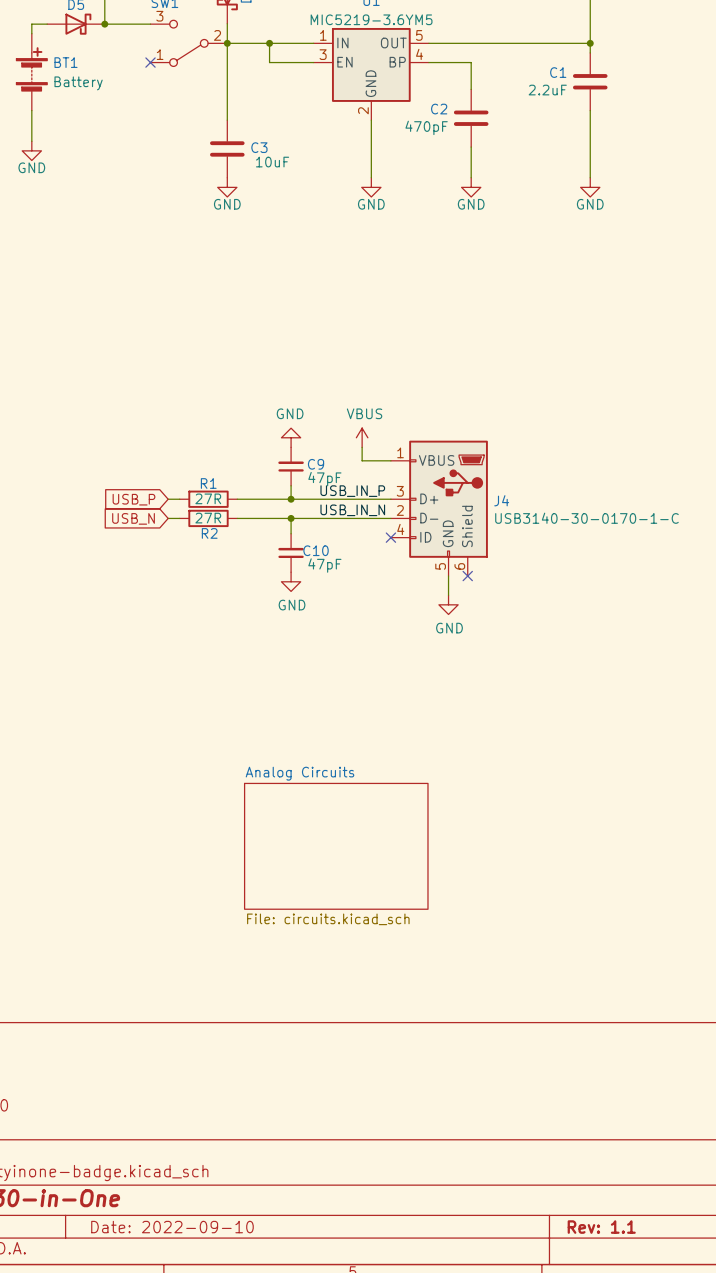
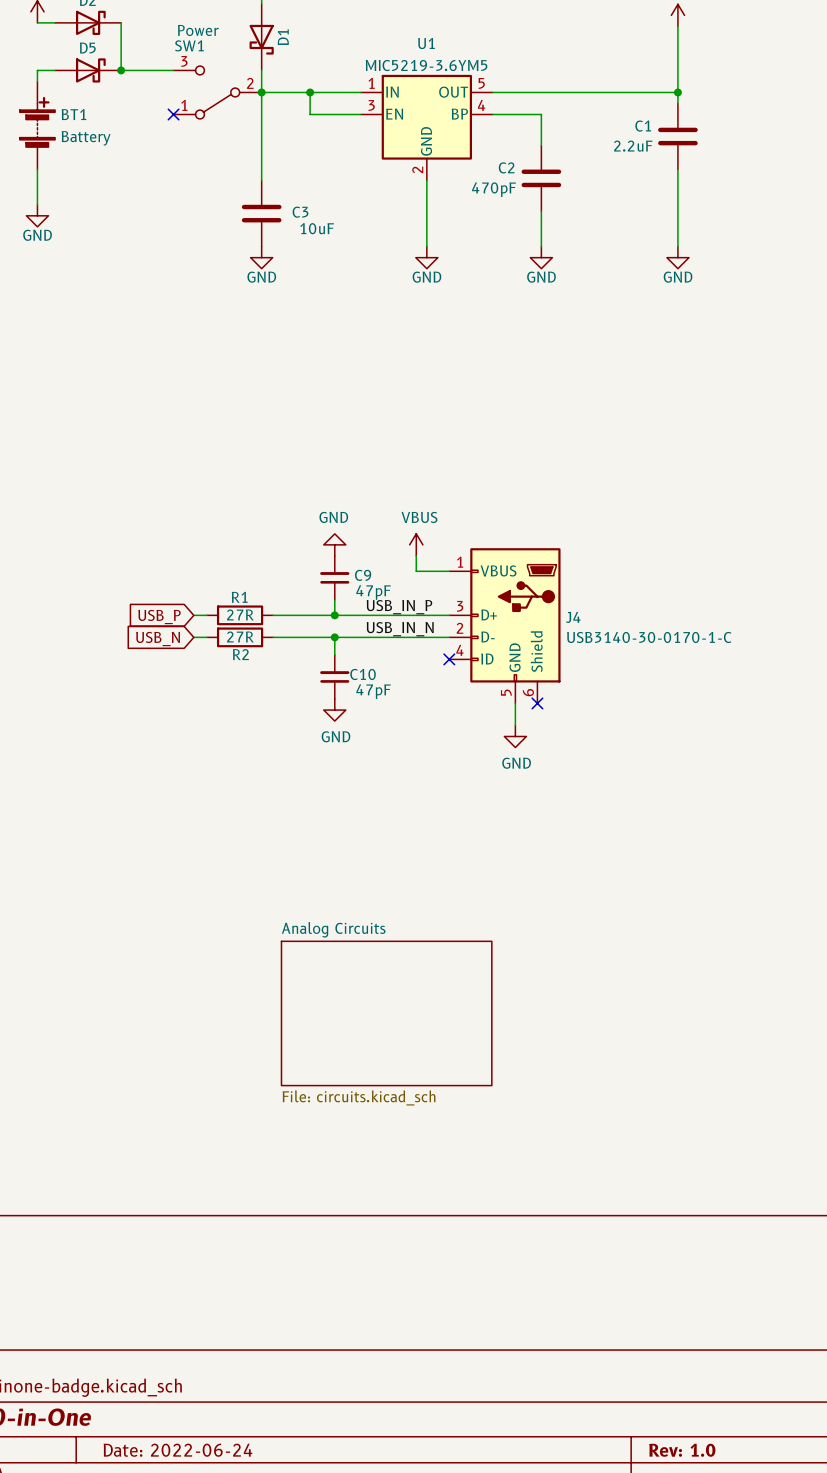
title block: Date: 2022-09-10 (172, 1227) -> Date: 2022-06-24 (178, 1450)
title block: Rev: 1.1 (601, 1227) -> Rev: 1.0 (682, 1450)

